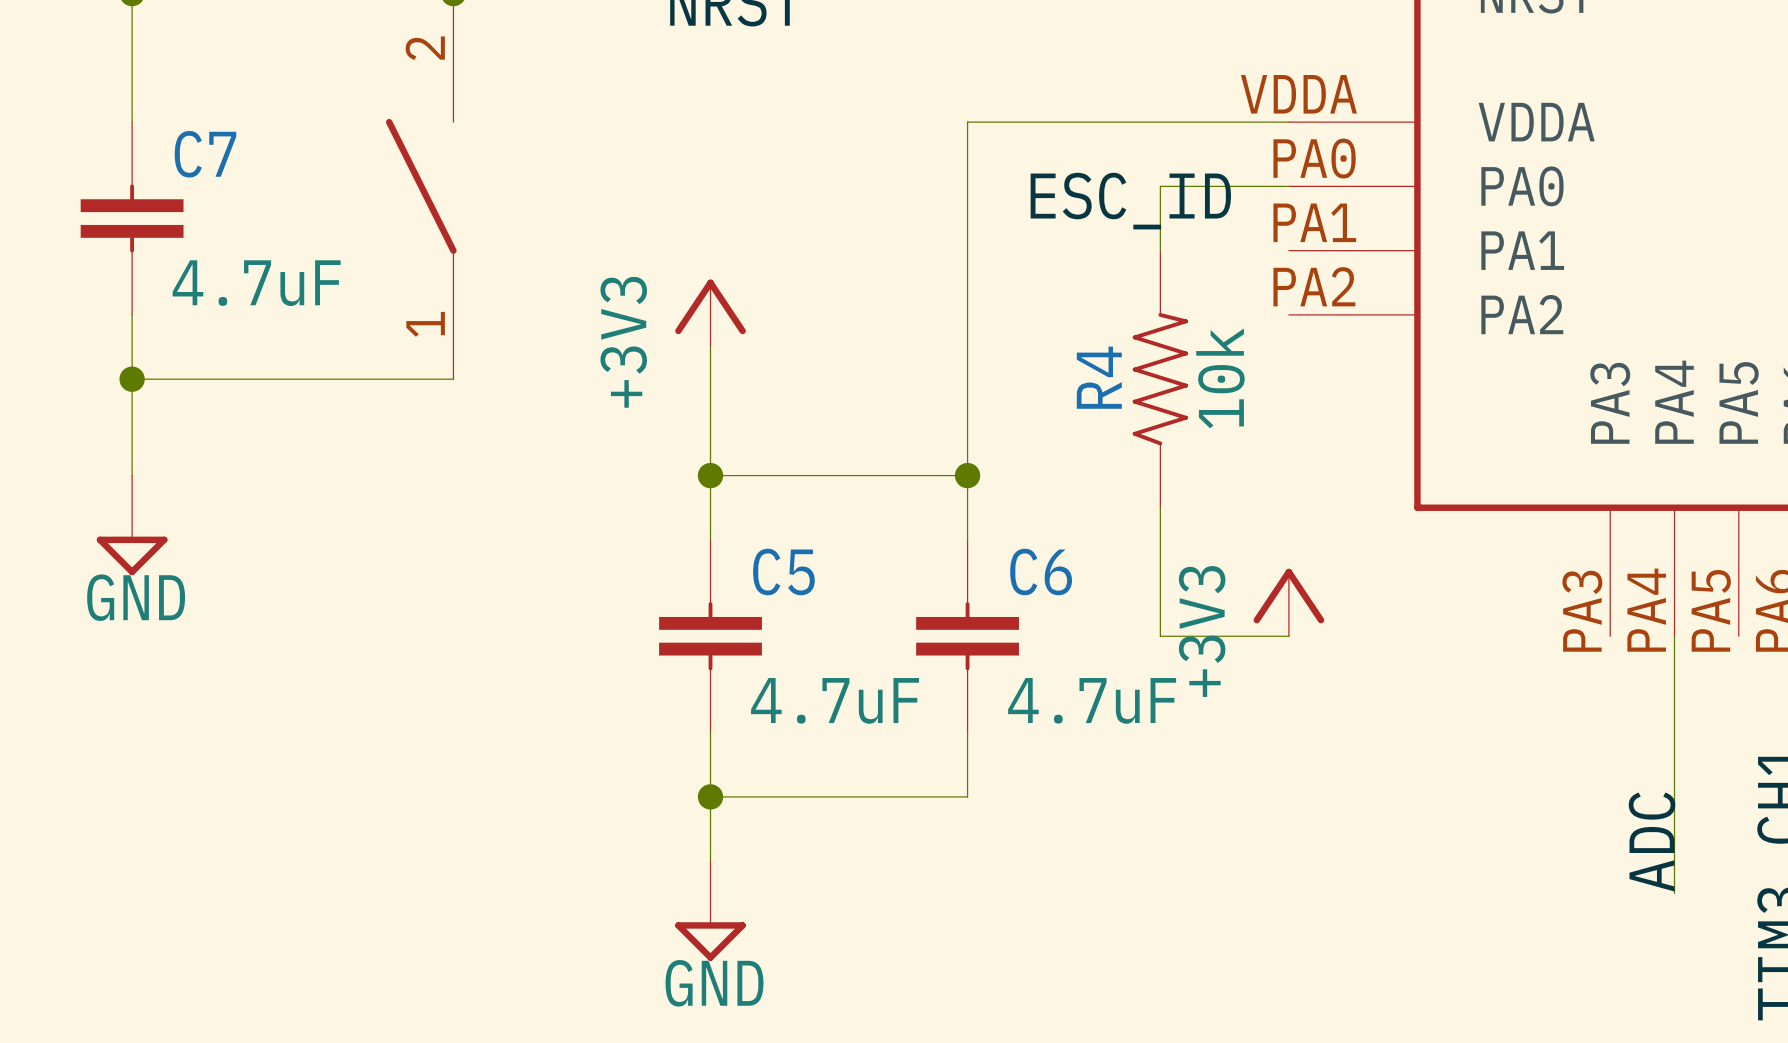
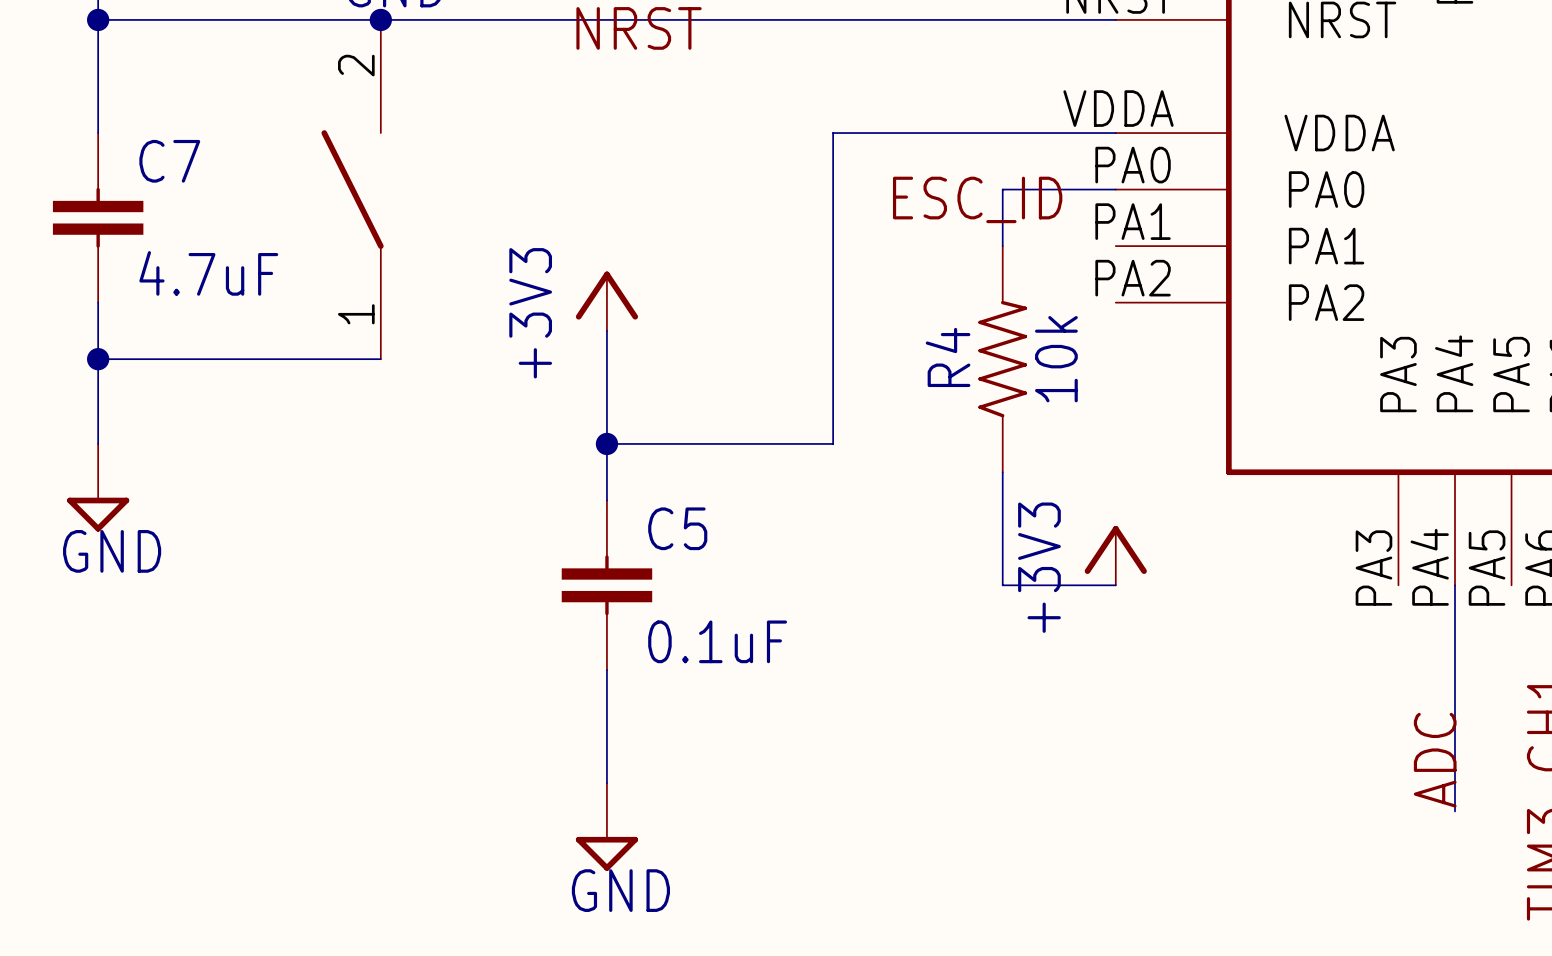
wire: (967, 475) (967, 539) -> none
junction: (967, 475) -> none
C6: 4.7uF (967, 636) -> none
C5 value: 4.7uF (835, 700) -> 0.1uF (717, 641)
wire: (967, 732) (967, 796) (710, 796) -> none
junction: (710, 796) -> none

